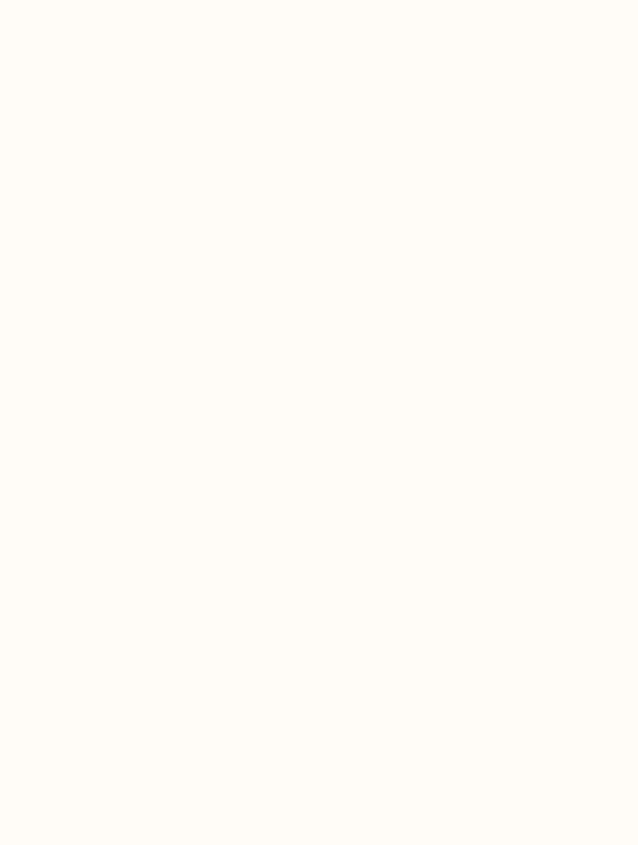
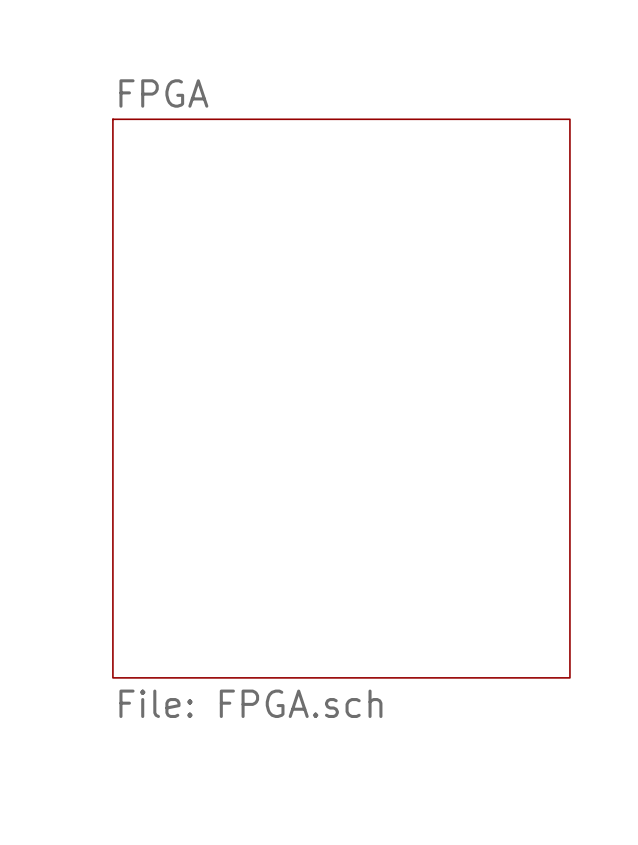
sheet FPGA: none -> File: FPGA.sch (341, 398)

